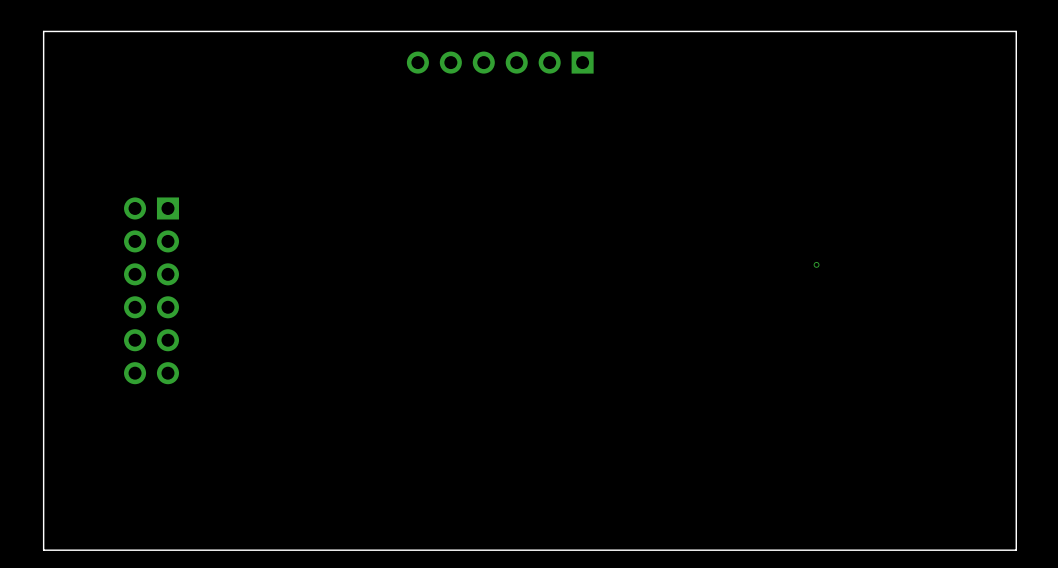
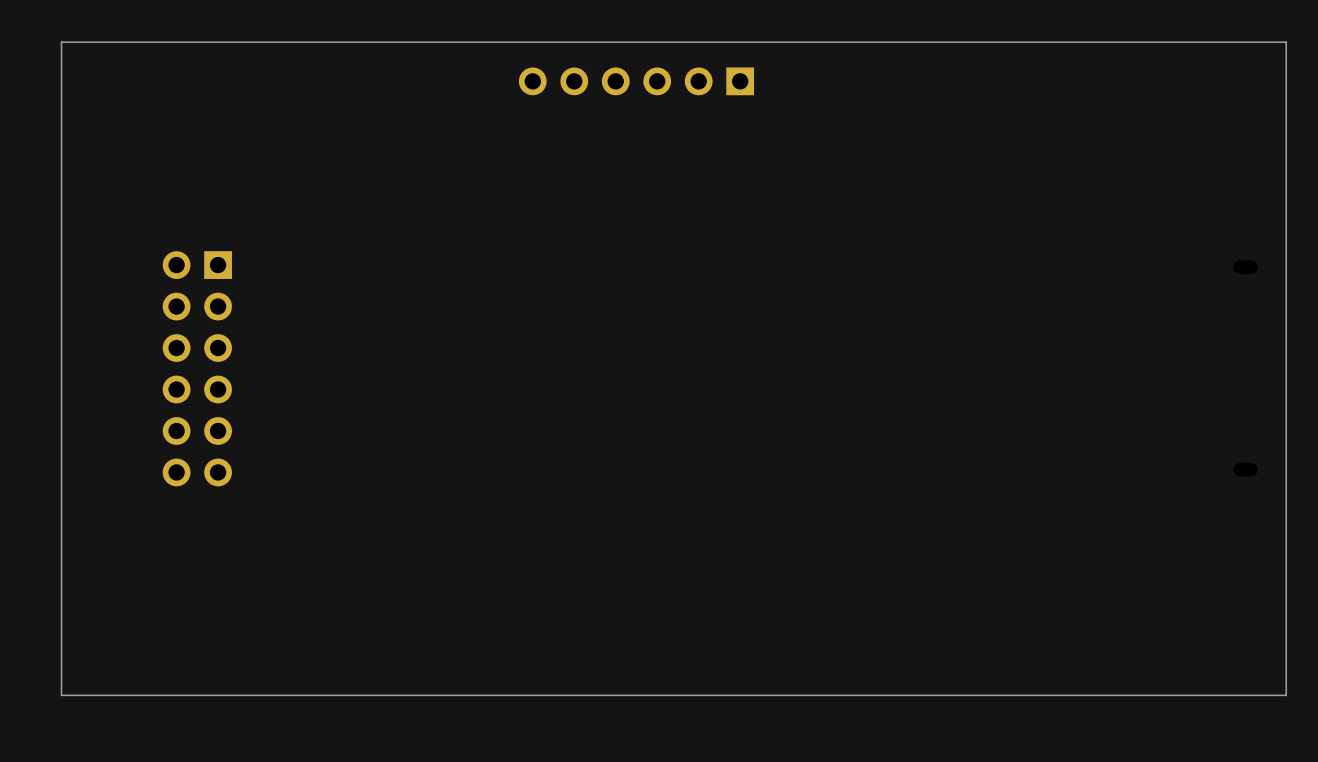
via: (816, 264) -> none

